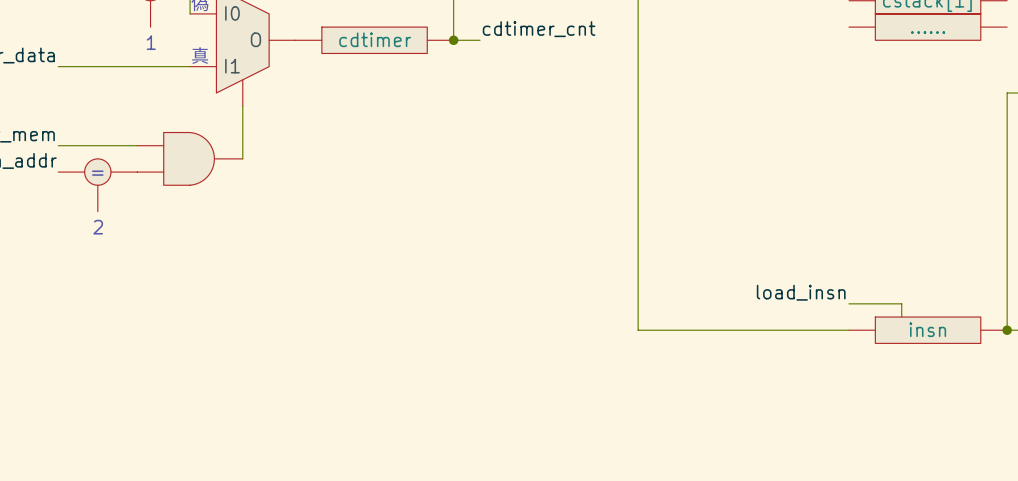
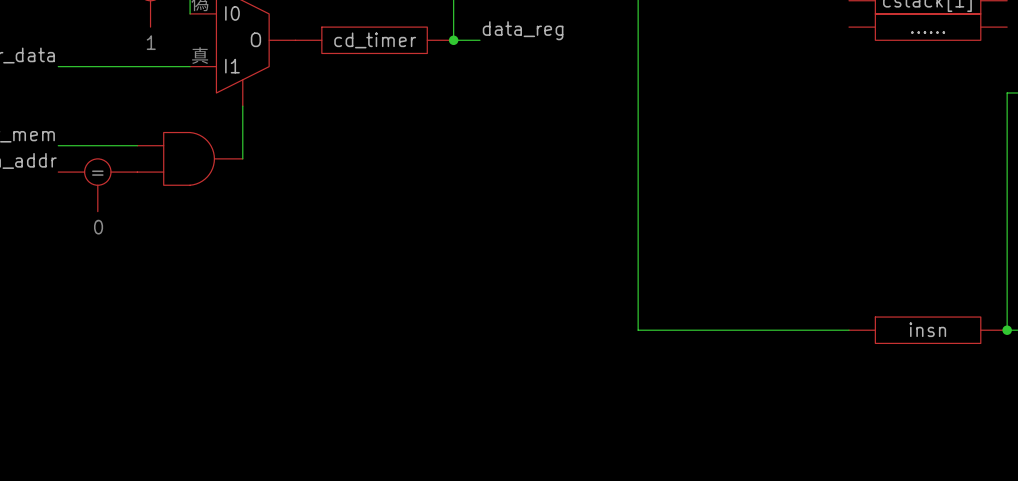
label: cdtimer_cnt (539, 29) -> data_reg (523, 30)
part value: cdtimer (375, 39) -> cd_timer (375, 40)
text: 2 (98, 227) -> 0 (98, 227)
label: load_insn (801, 292) -> none
wire: (849, 303) (901, 303) (901, 317) -> none

